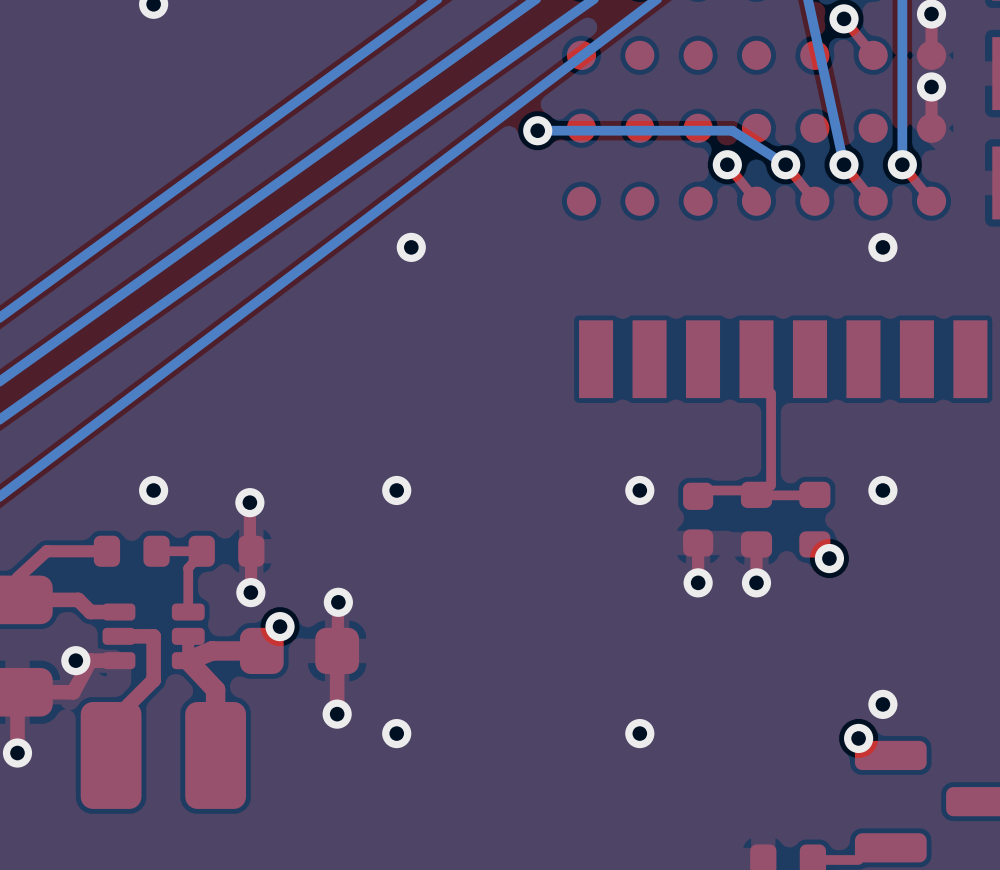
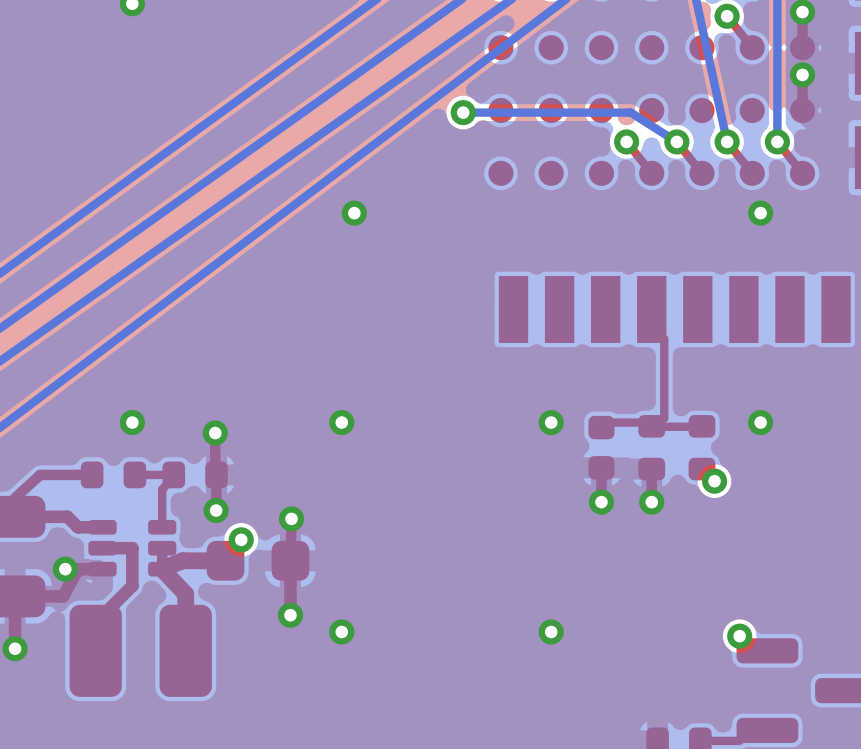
via: (882, 704) -> none

